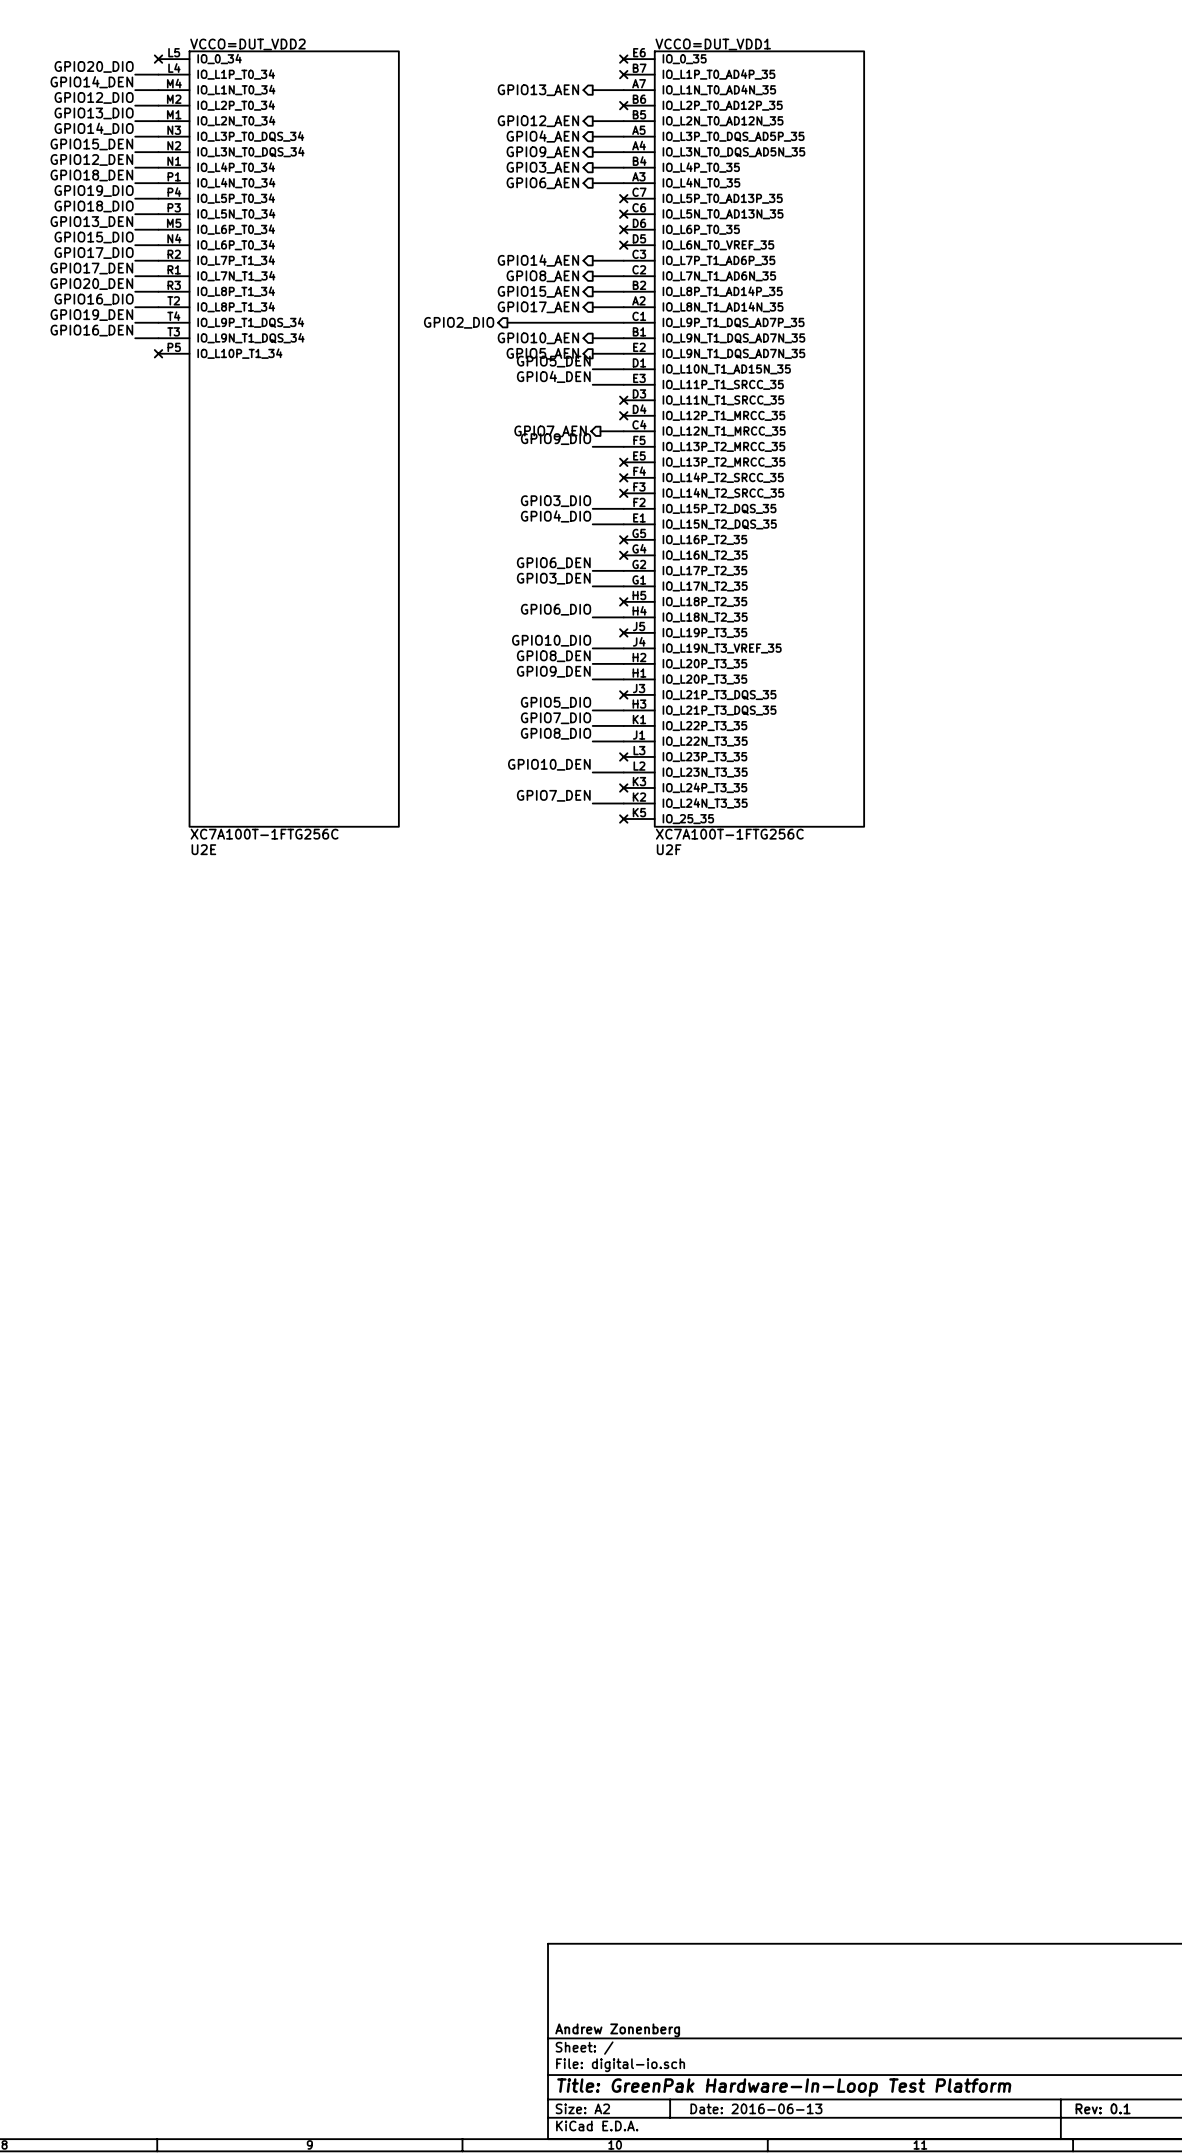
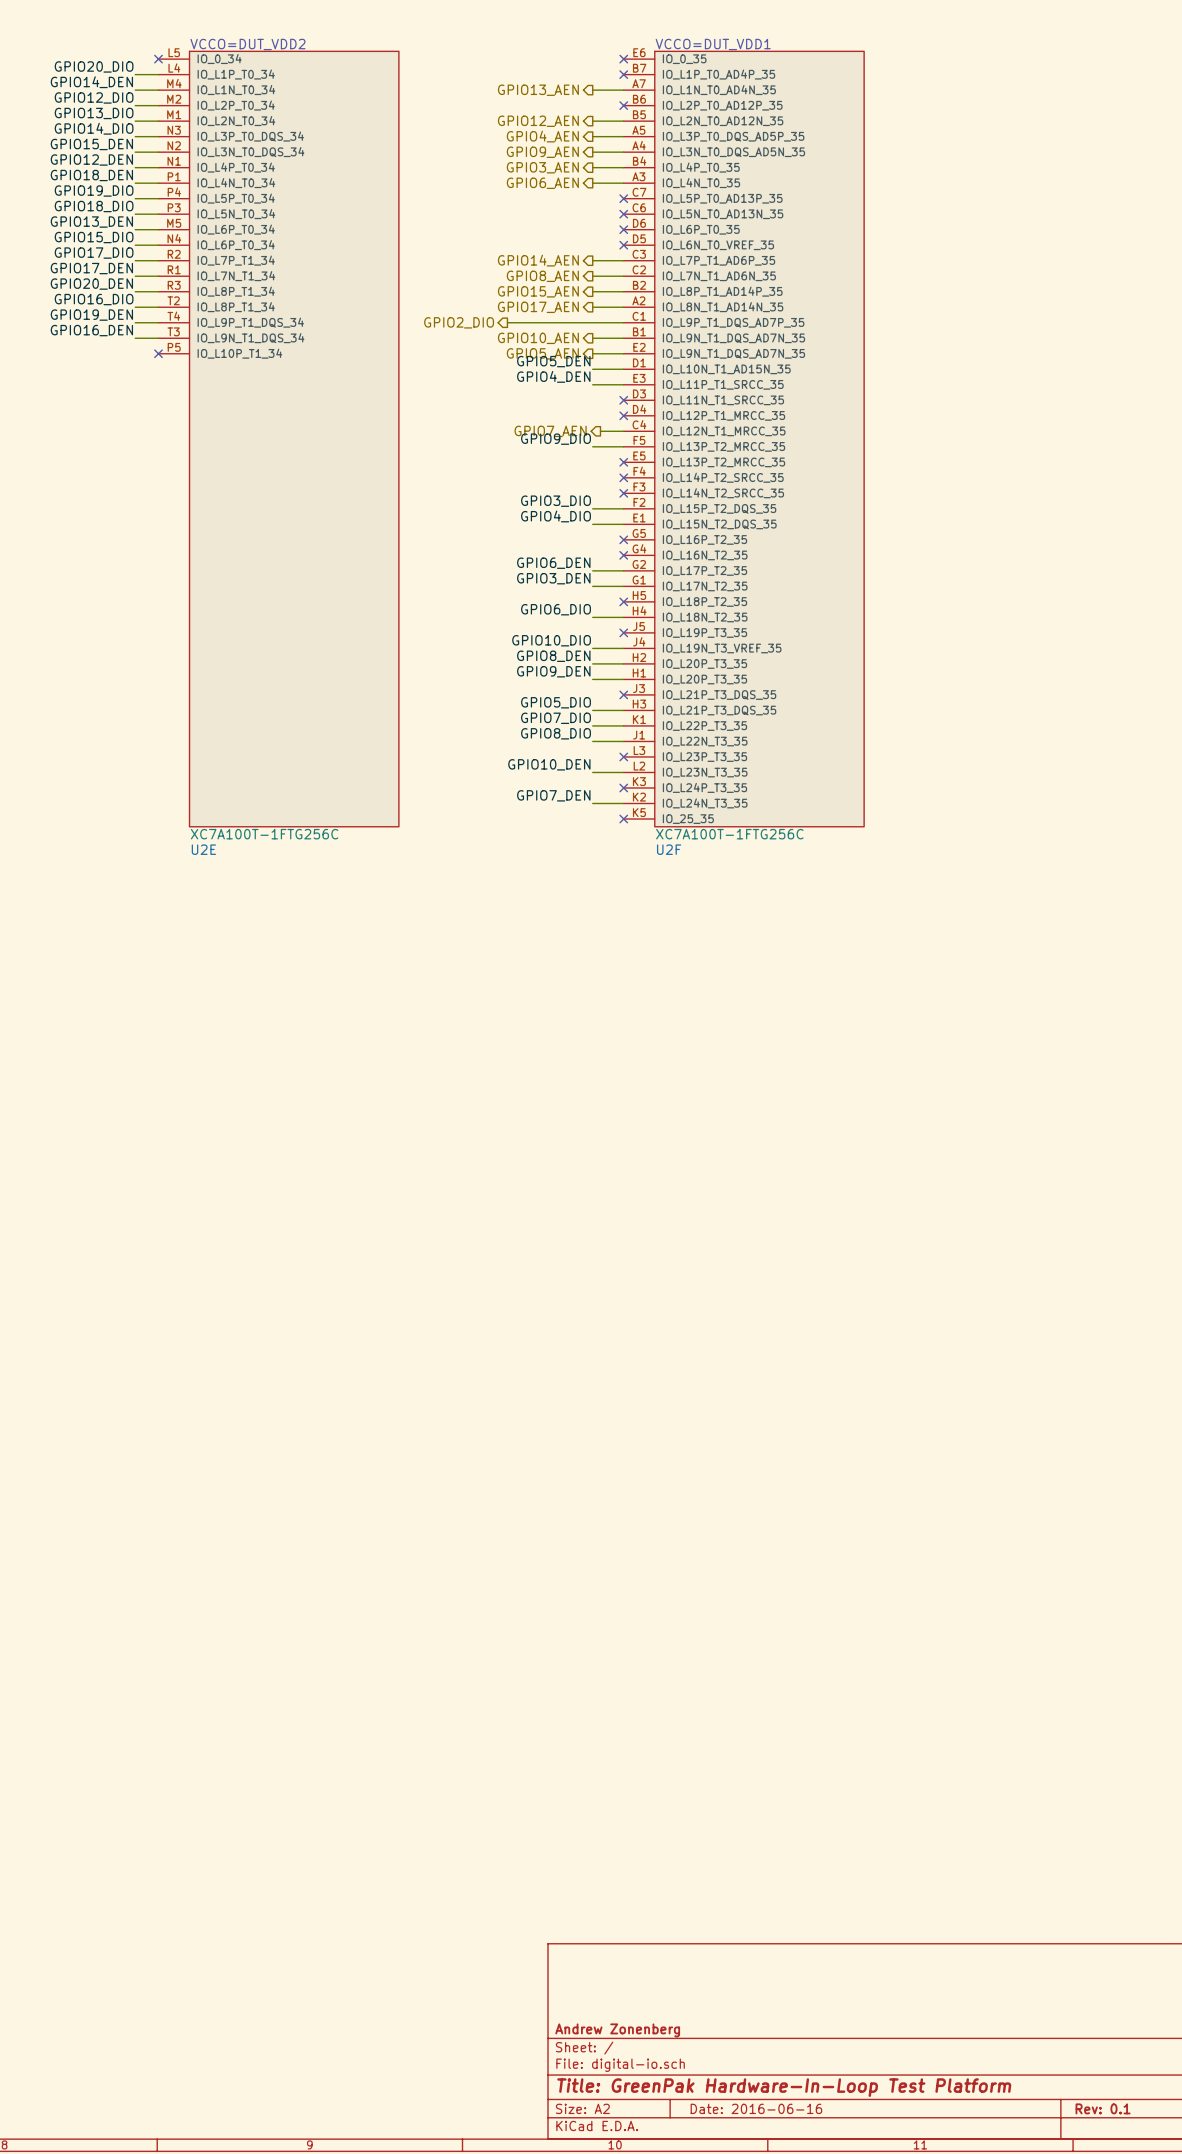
title block: Date: 2016-06-13 (756, 2108) -> Date: 2016-06-16 (756, 2108)

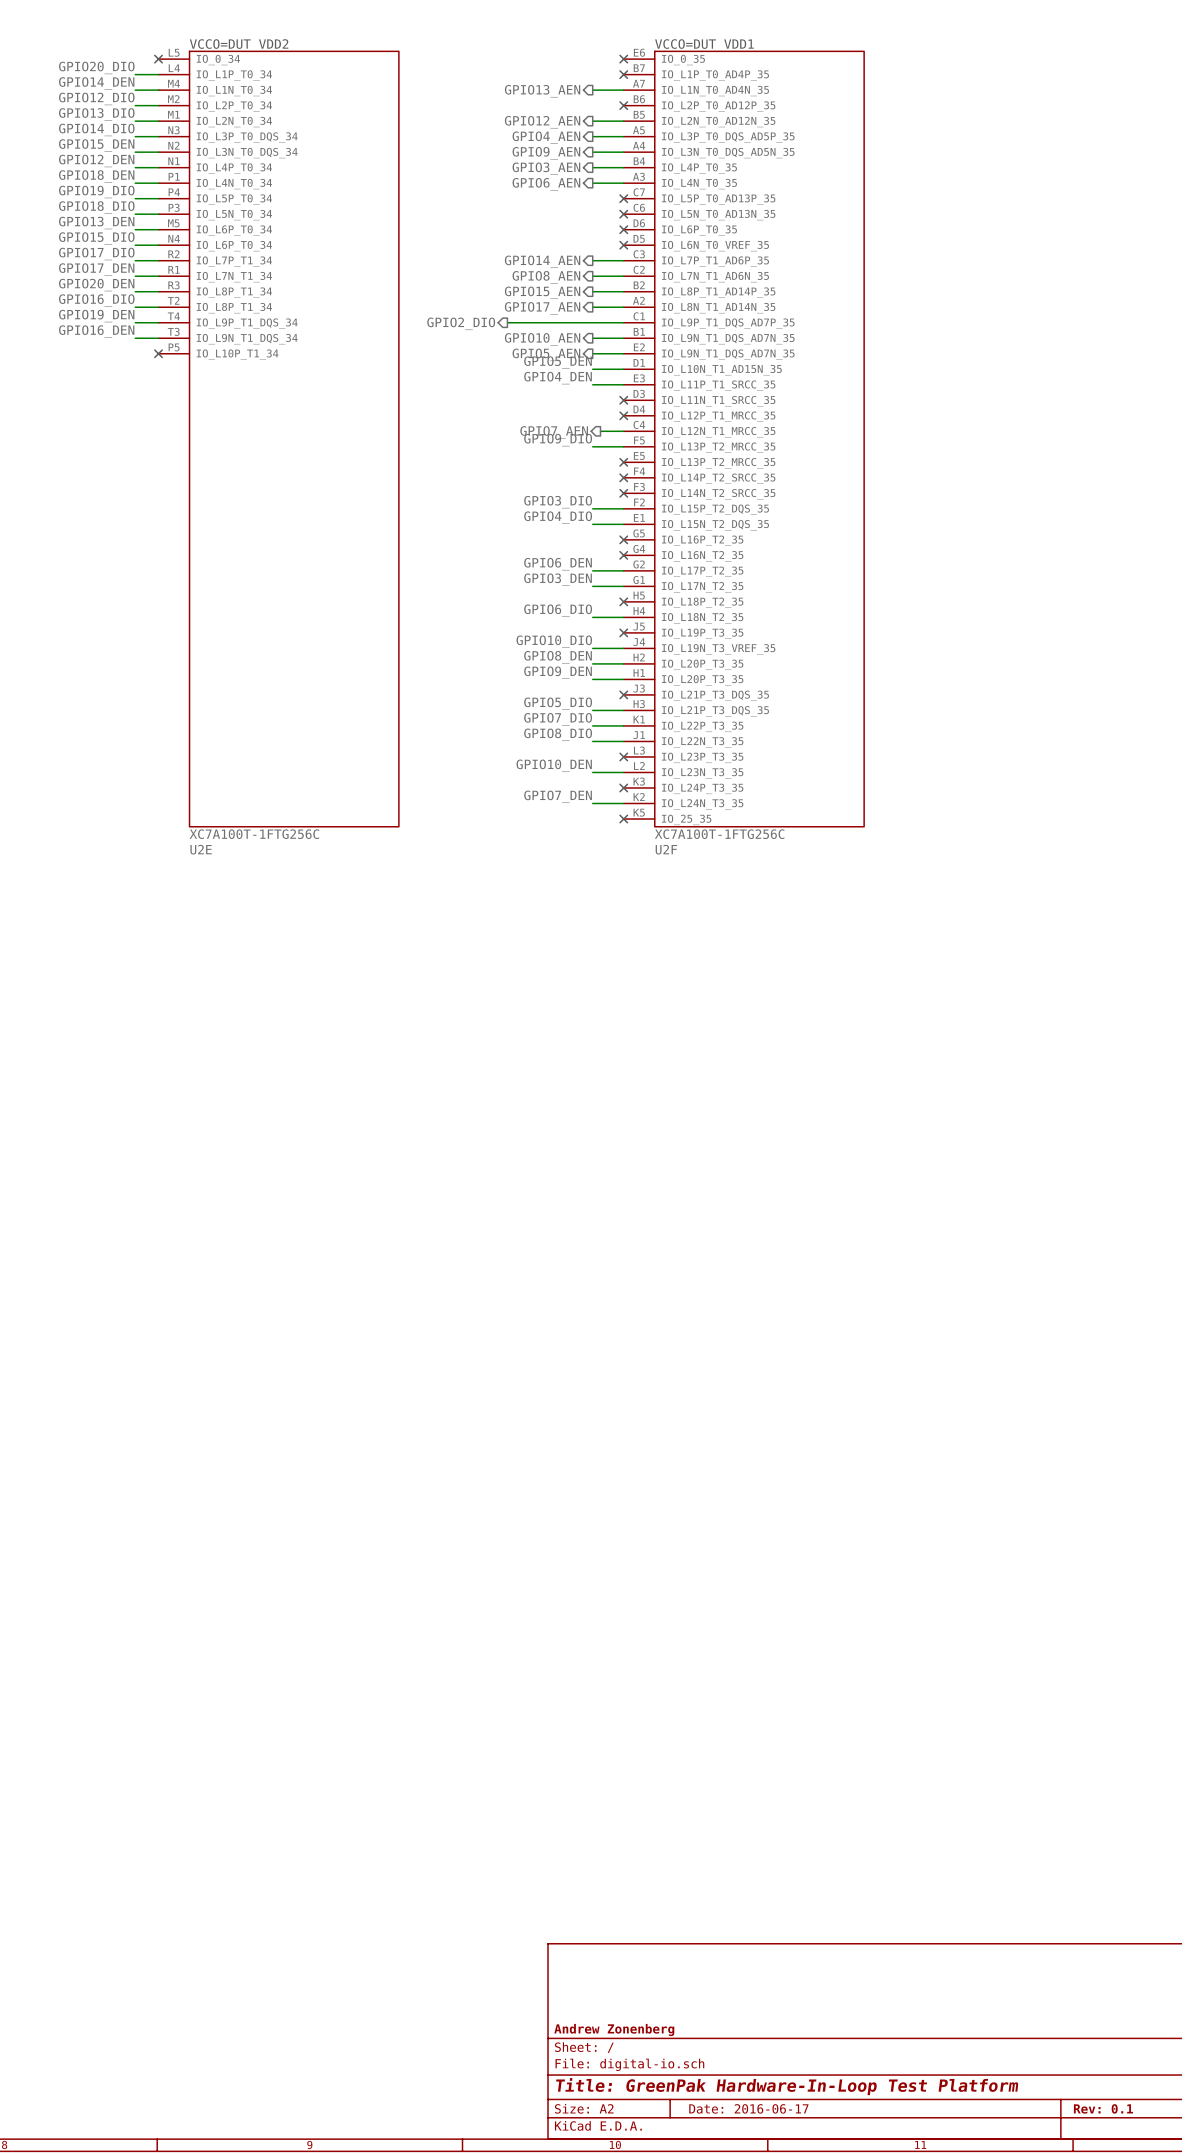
title block: Date: 2016-06-16 (756, 2108) -> Date: 2016-06-17 (748, 2108)

